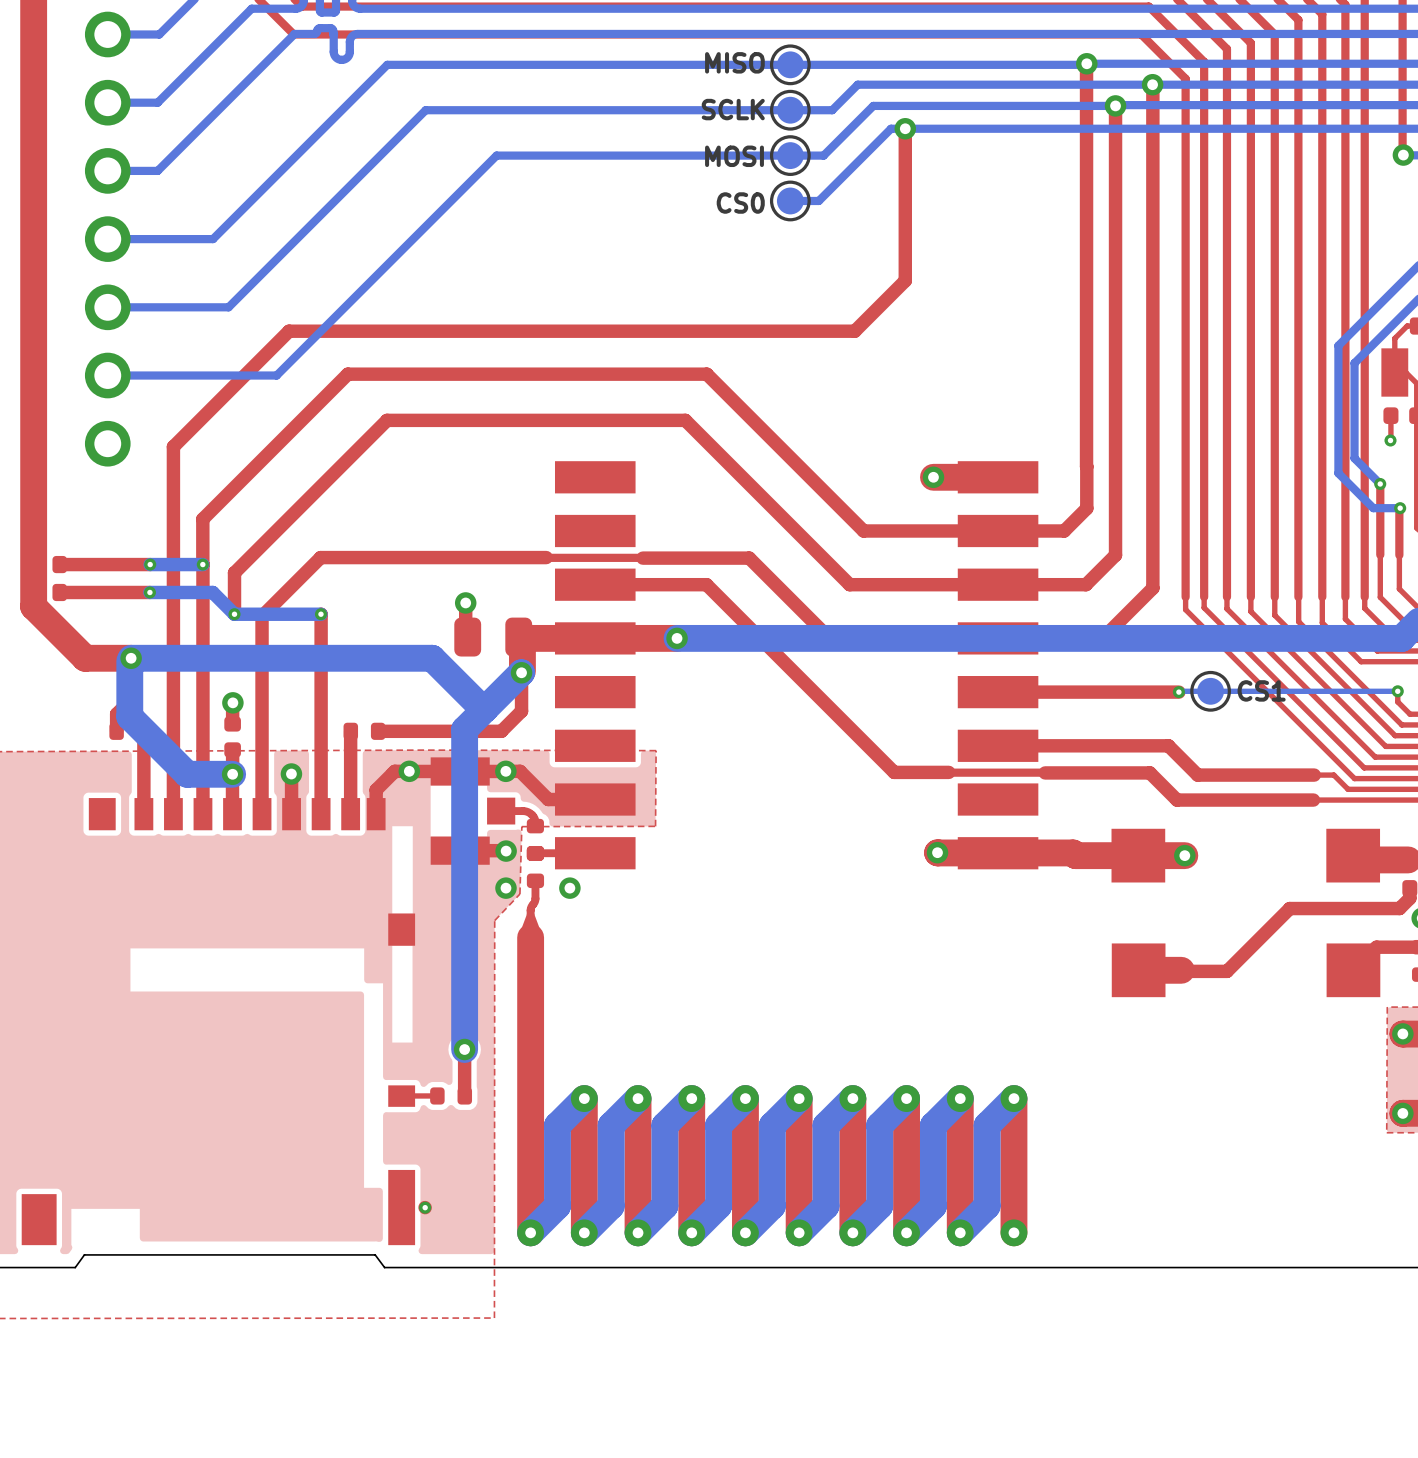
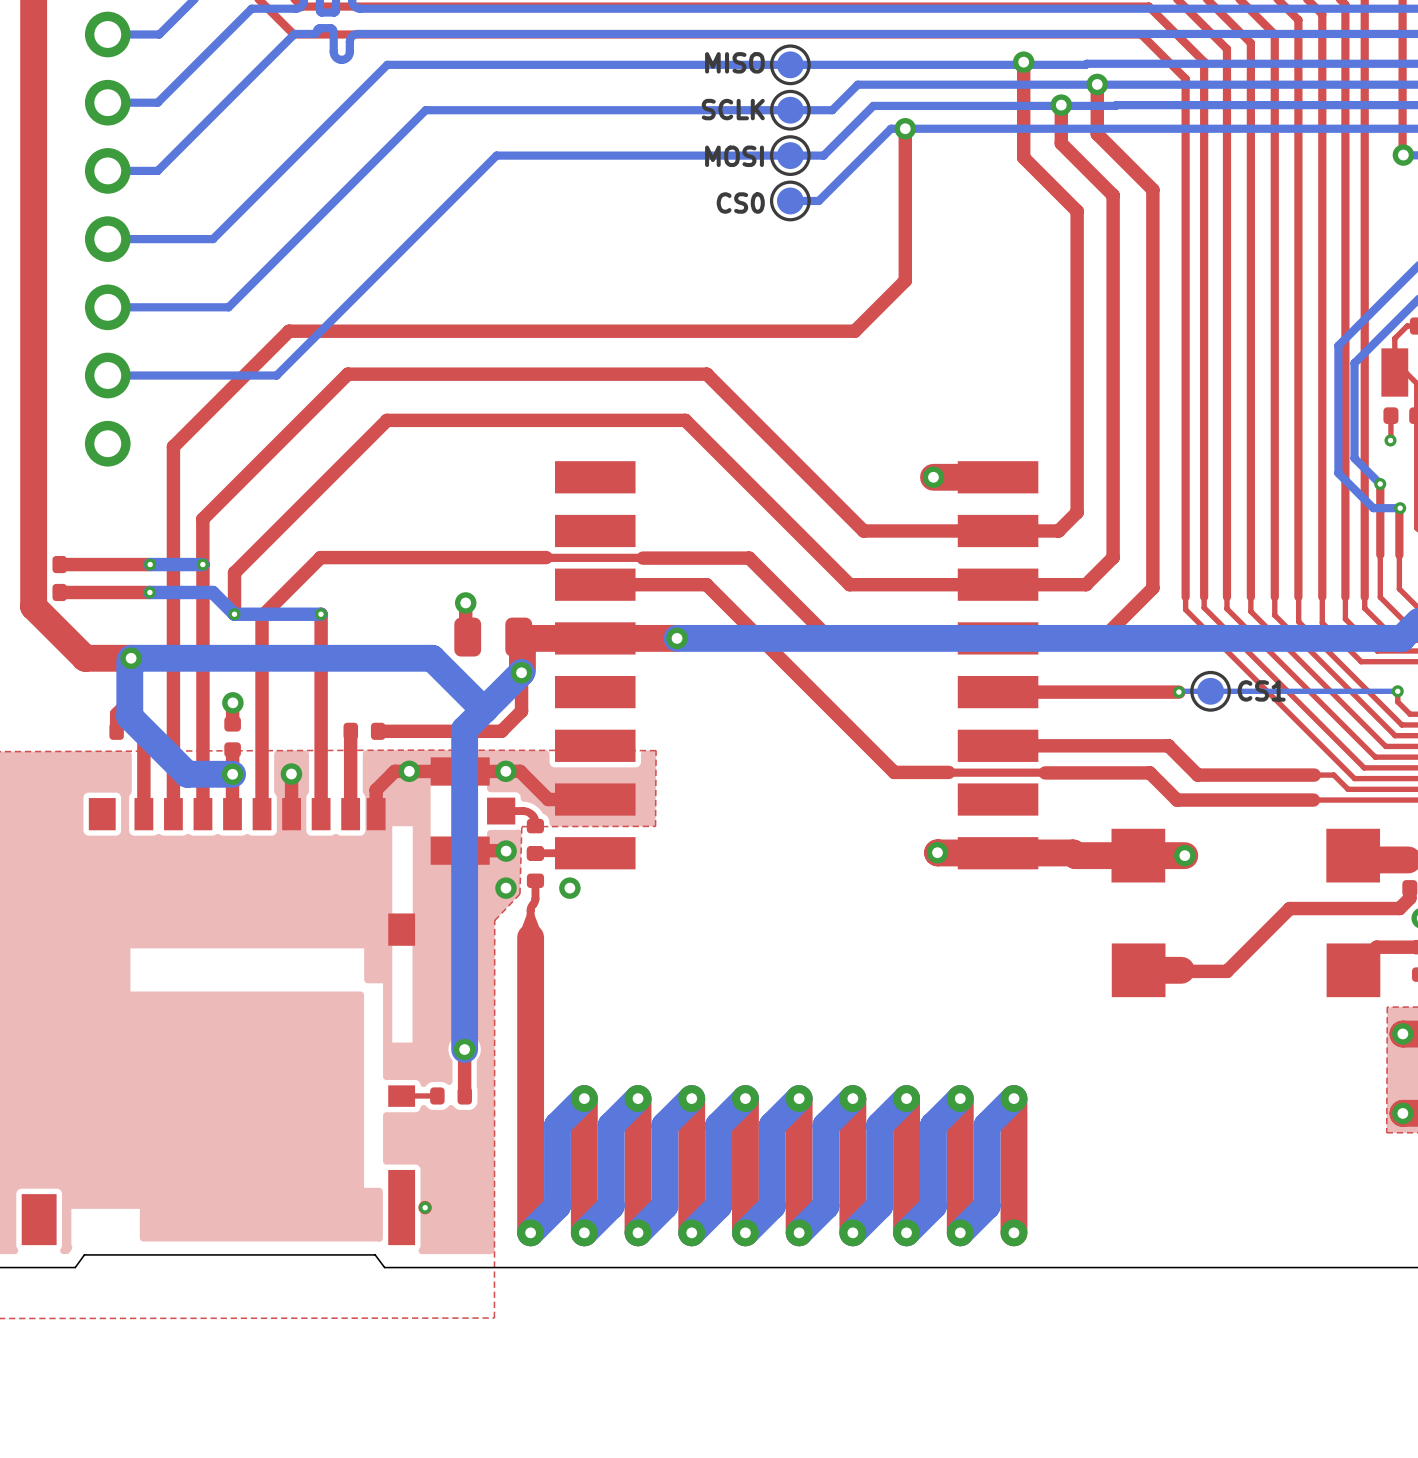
via: none -> (1023, 62)
via: (1086, 63) -> none
top track: (1086, 64) (1086, 466) -> none
via: none -> (1097, 84)
top track: (1152, 84) (1152, 189) -> (1097, 84) (1097, 134) (1152, 189)
via: (1152, 84) -> none
via: none -> (1061, 105)
top track: (1115, 105) (1115, 555) (1113, 557) -> (1061, 105) (1061, 143) (1113, 195) (1113, 557)
via: (1115, 105) -> none
top track: (1086, 466) (1086, 508) (1064, 530) (1058, 530) -> (1023, 62) (1023, 157) (1077, 211) (1077, 512) (1058, 530)

